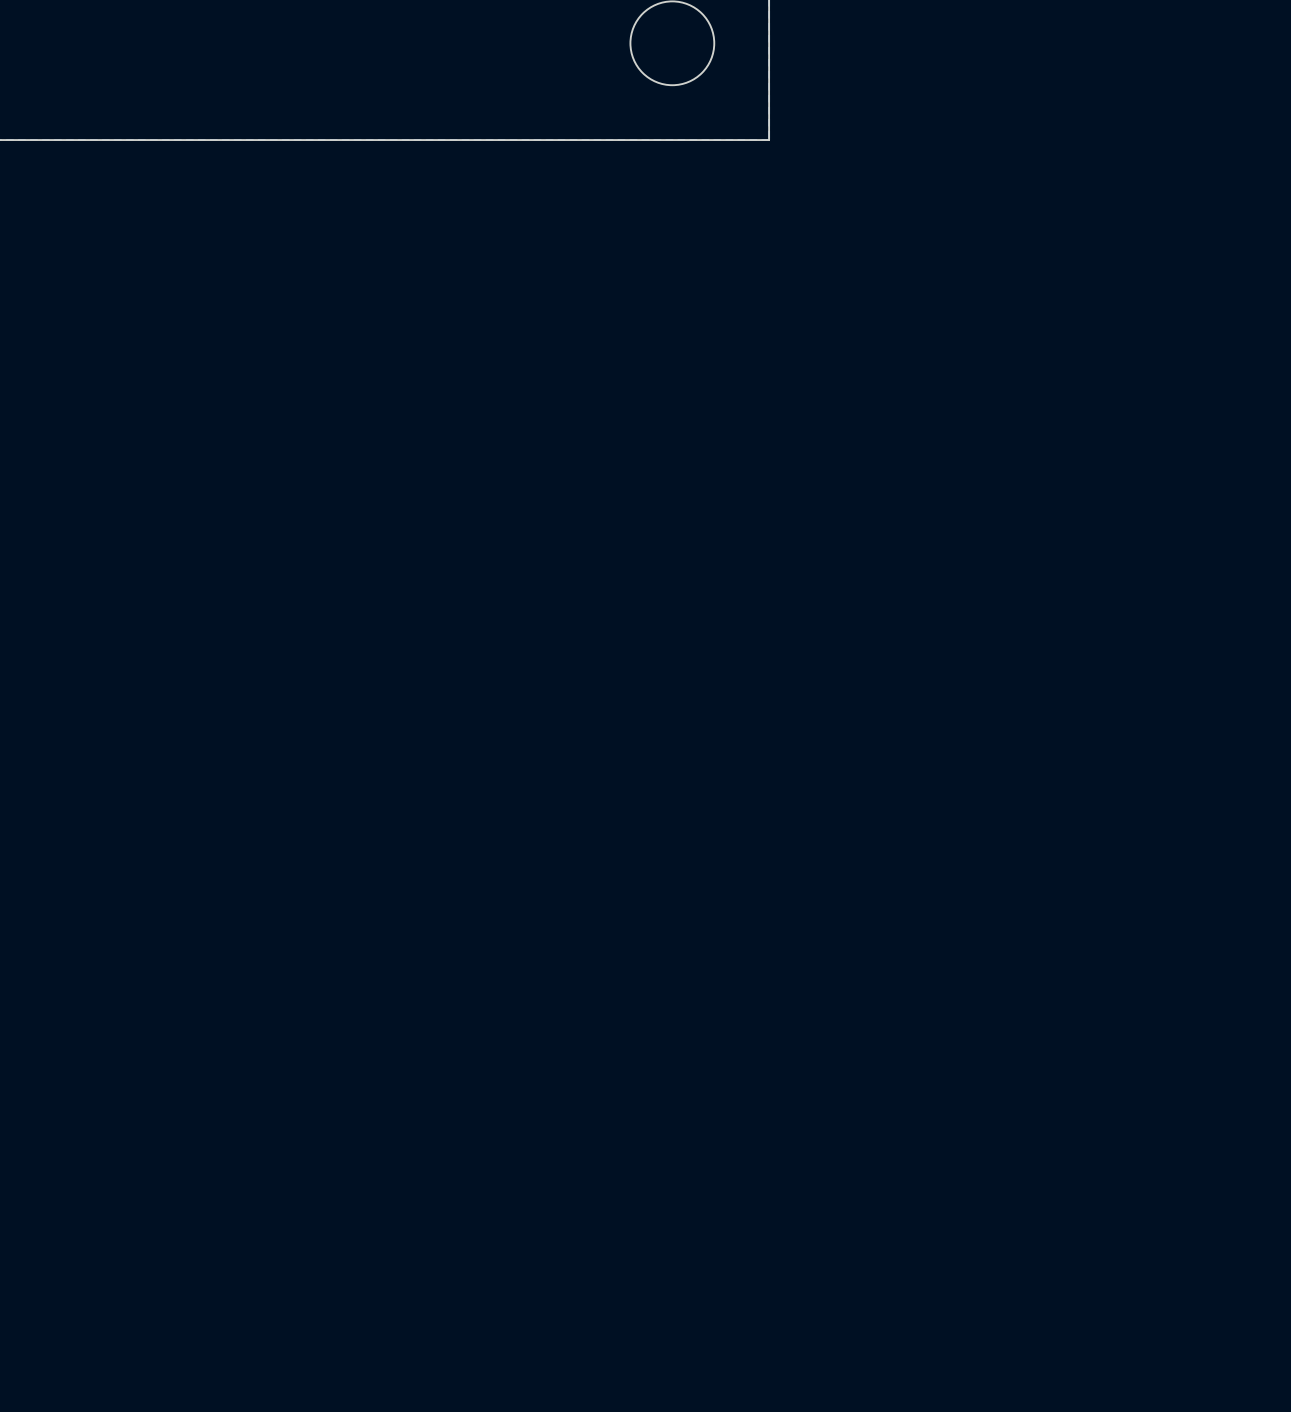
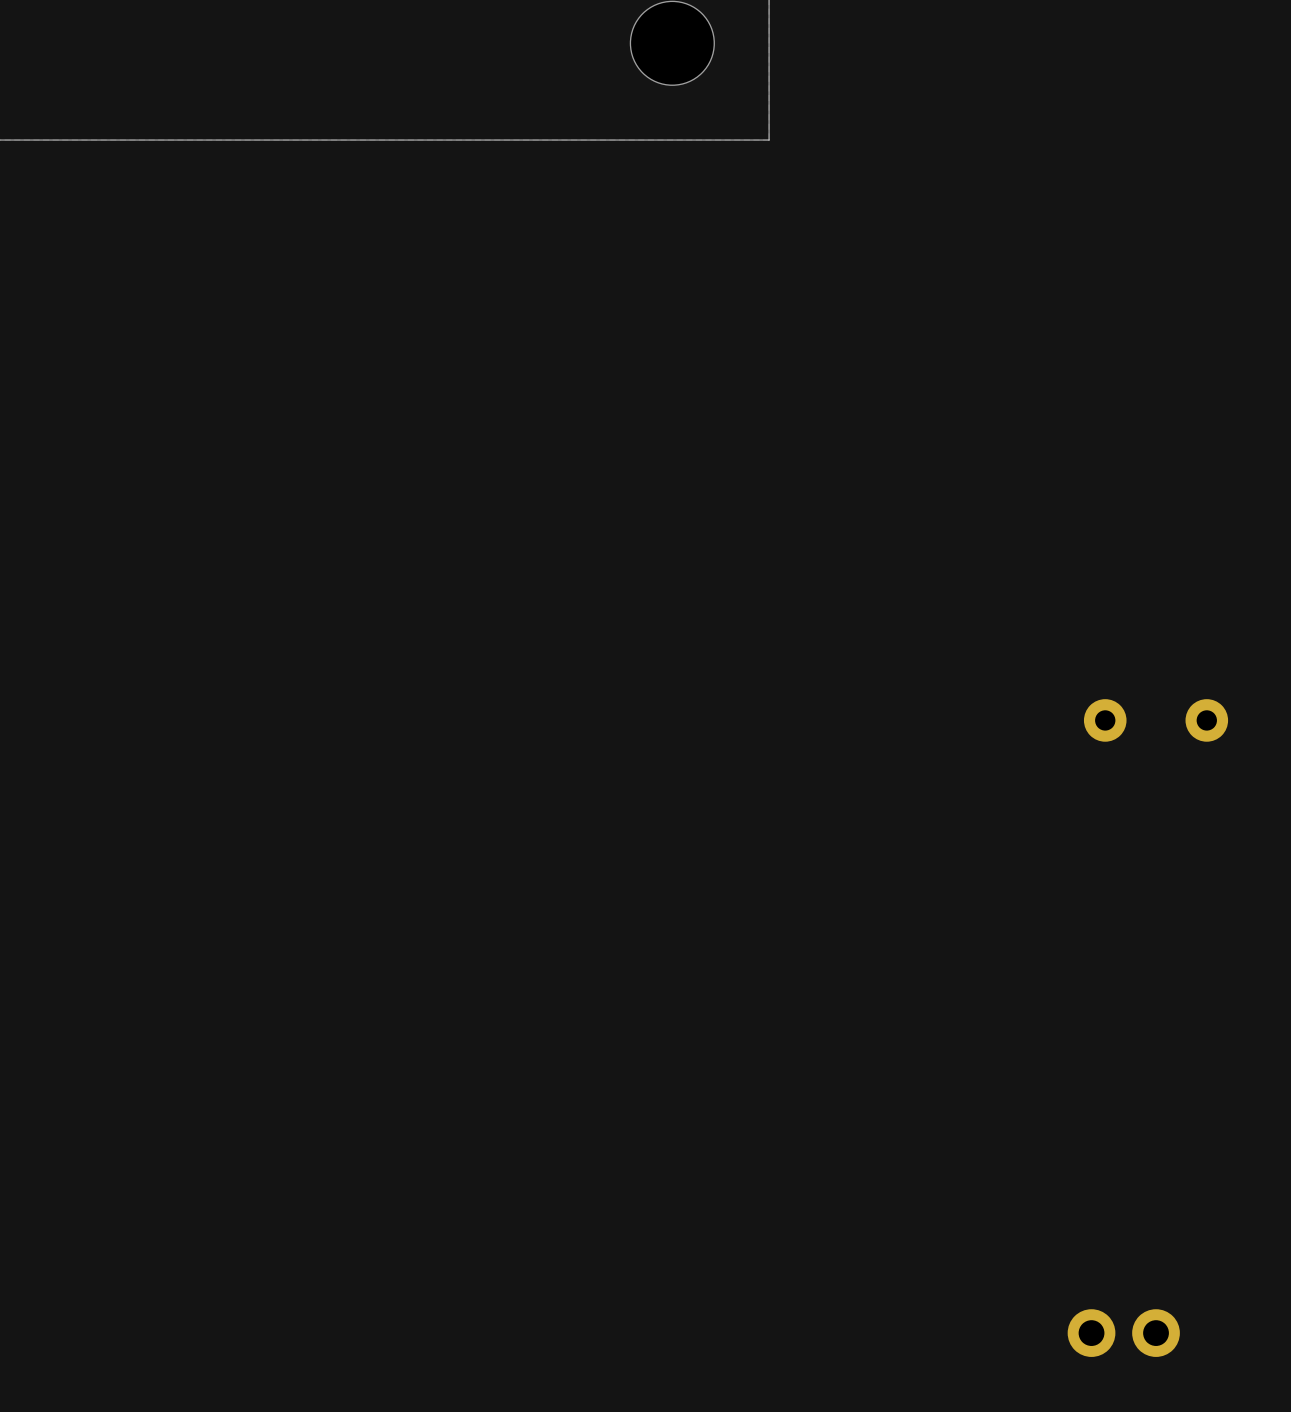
part: none -> (1156, 720)
part: none -> (1123, 1333)

